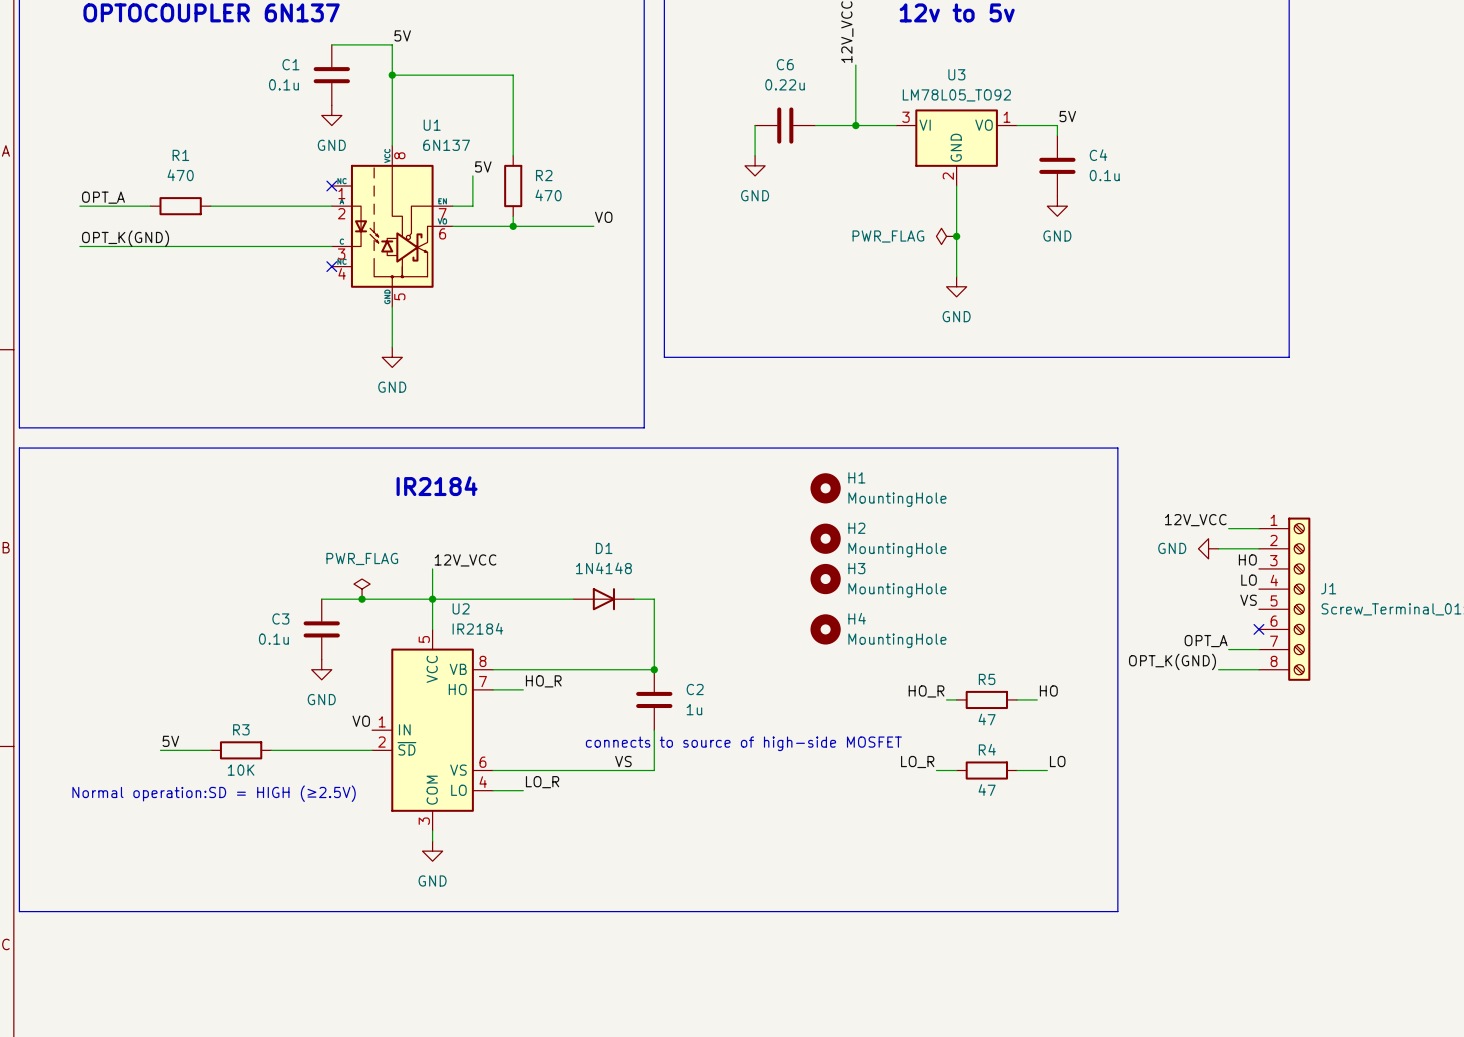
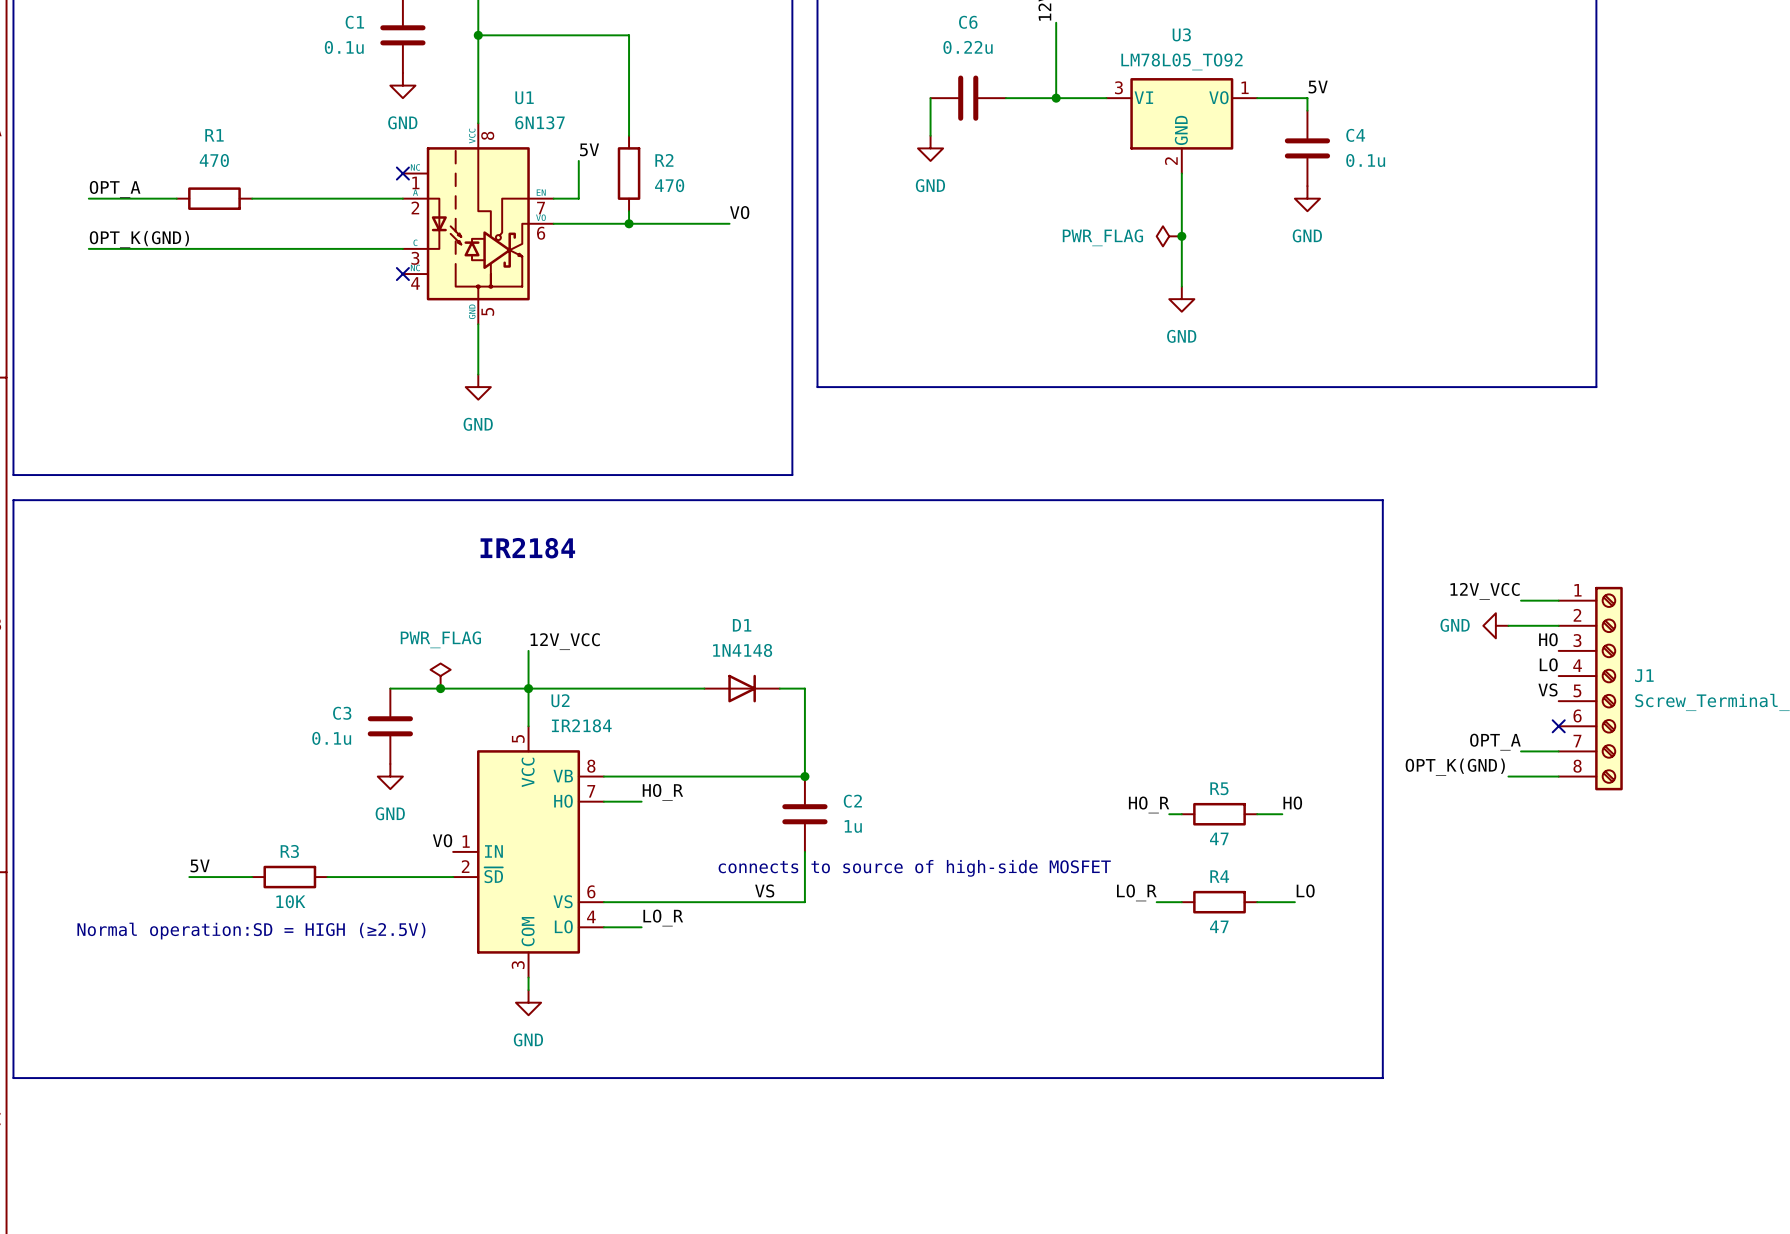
H1: MountingHole (825, 488) -> none
H2: MountingHole (825, 538) -> none
H3: MountingHole (825, 579) -> none
H4: MountingHole (825, 629) -> none

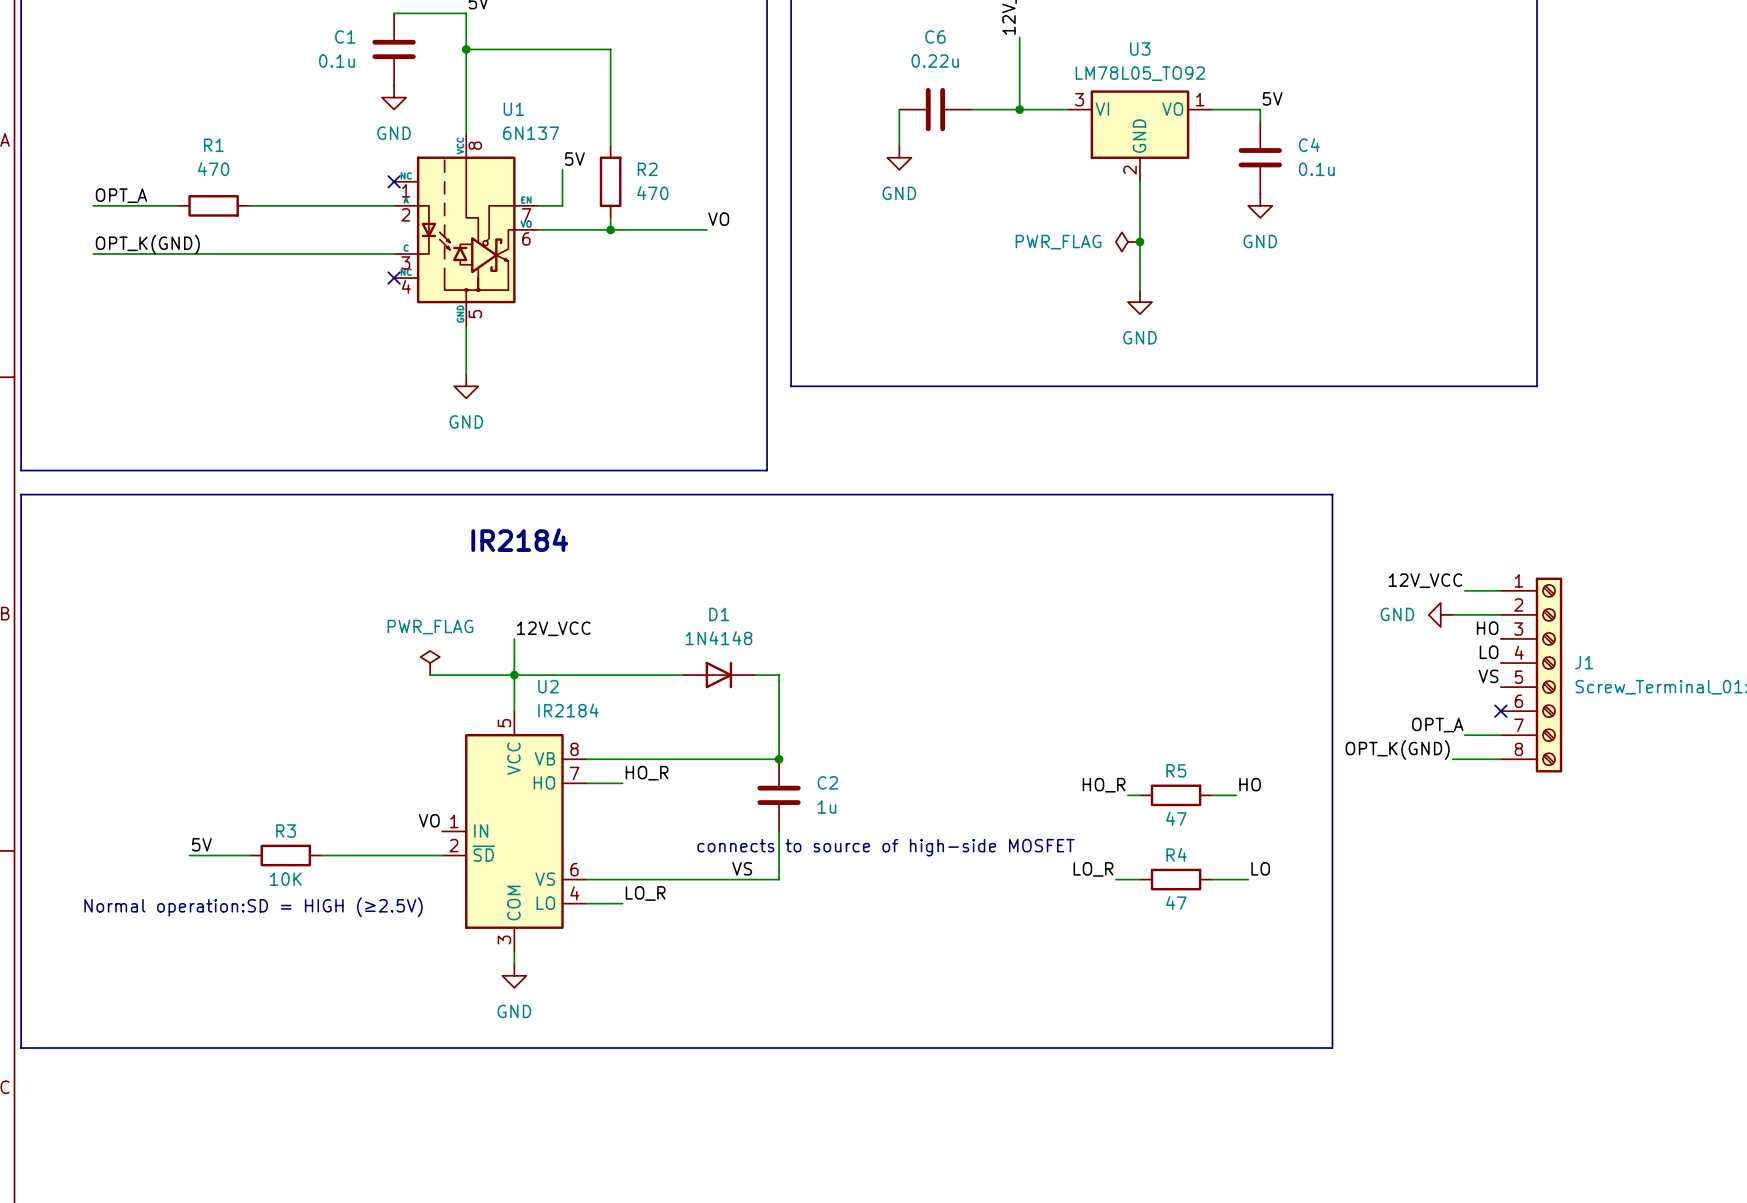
wire: (390, 688) (440, 688) -> none
junction: (440, 688) -> none
C3: 0.1u (390, 726) -> none
power symbol: GND (390, 776) -> none

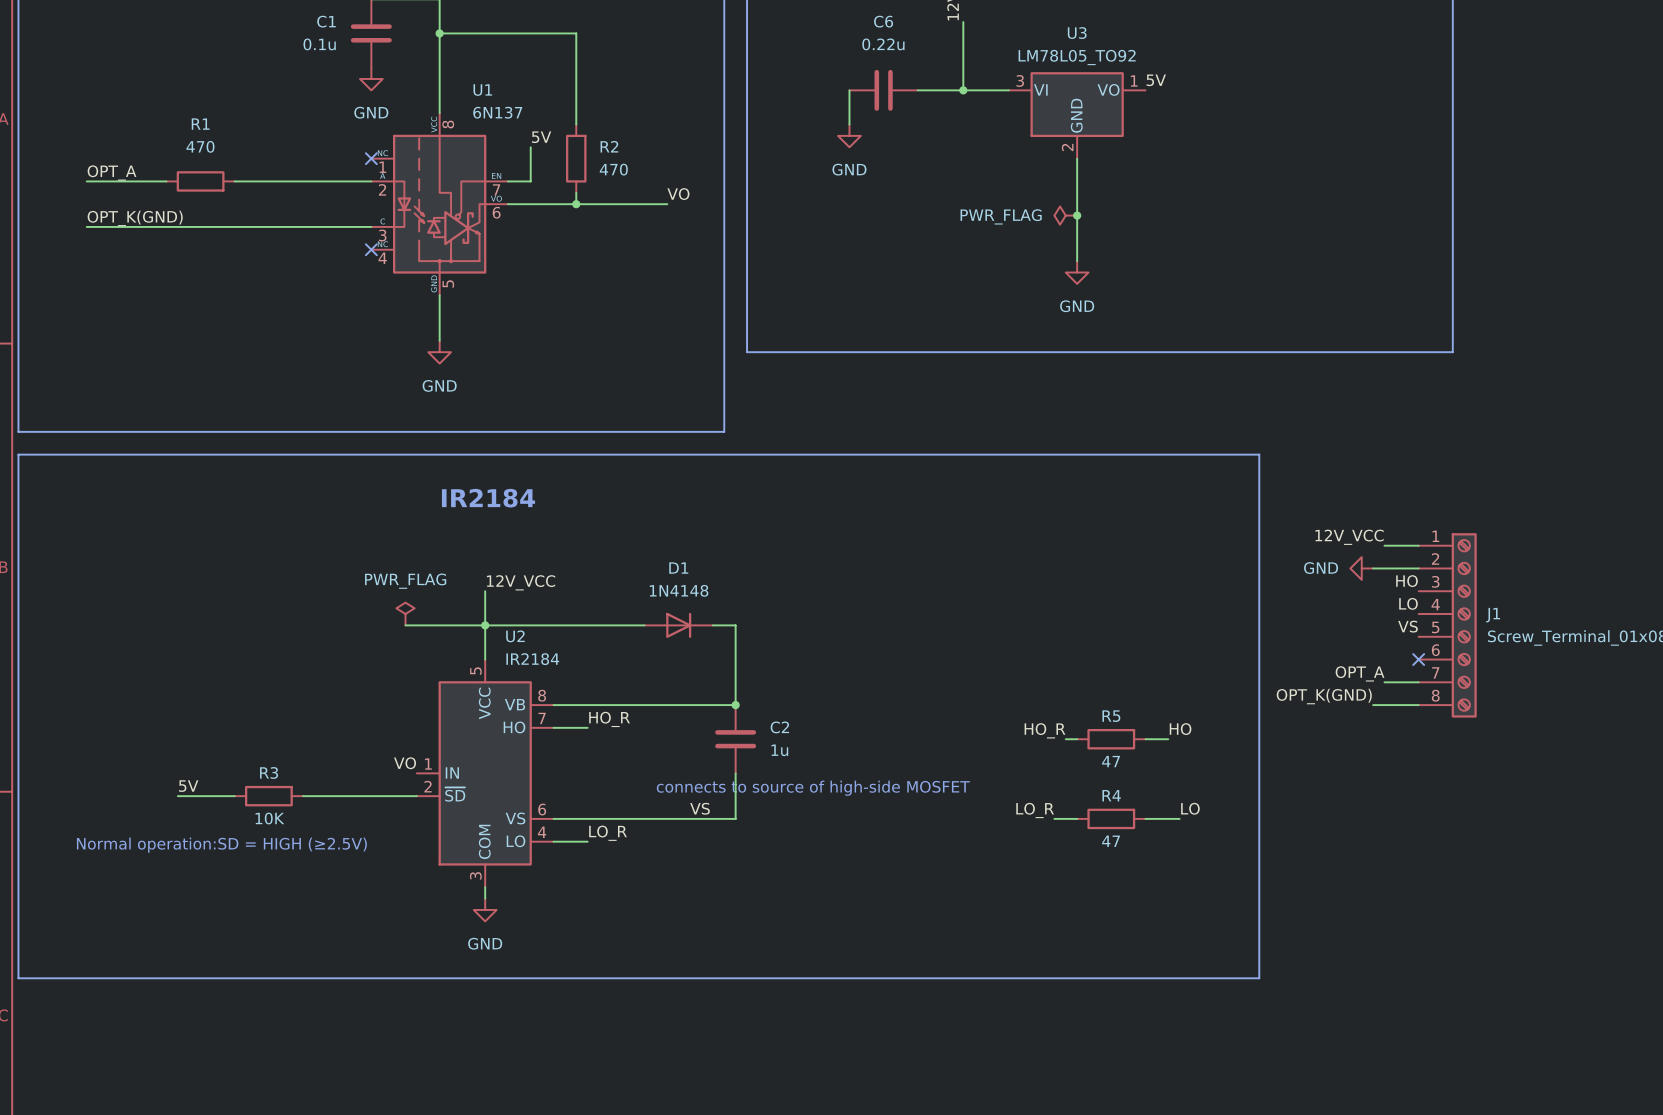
label position: 5V (1272, 98) -> 5V (1156, 80)
wire: (1212, 109) (1260, 109) (1260, 121) -> none
C4: 0.1u (1260, 157) -> none
power symbol: GND (1260, 205) -> none

